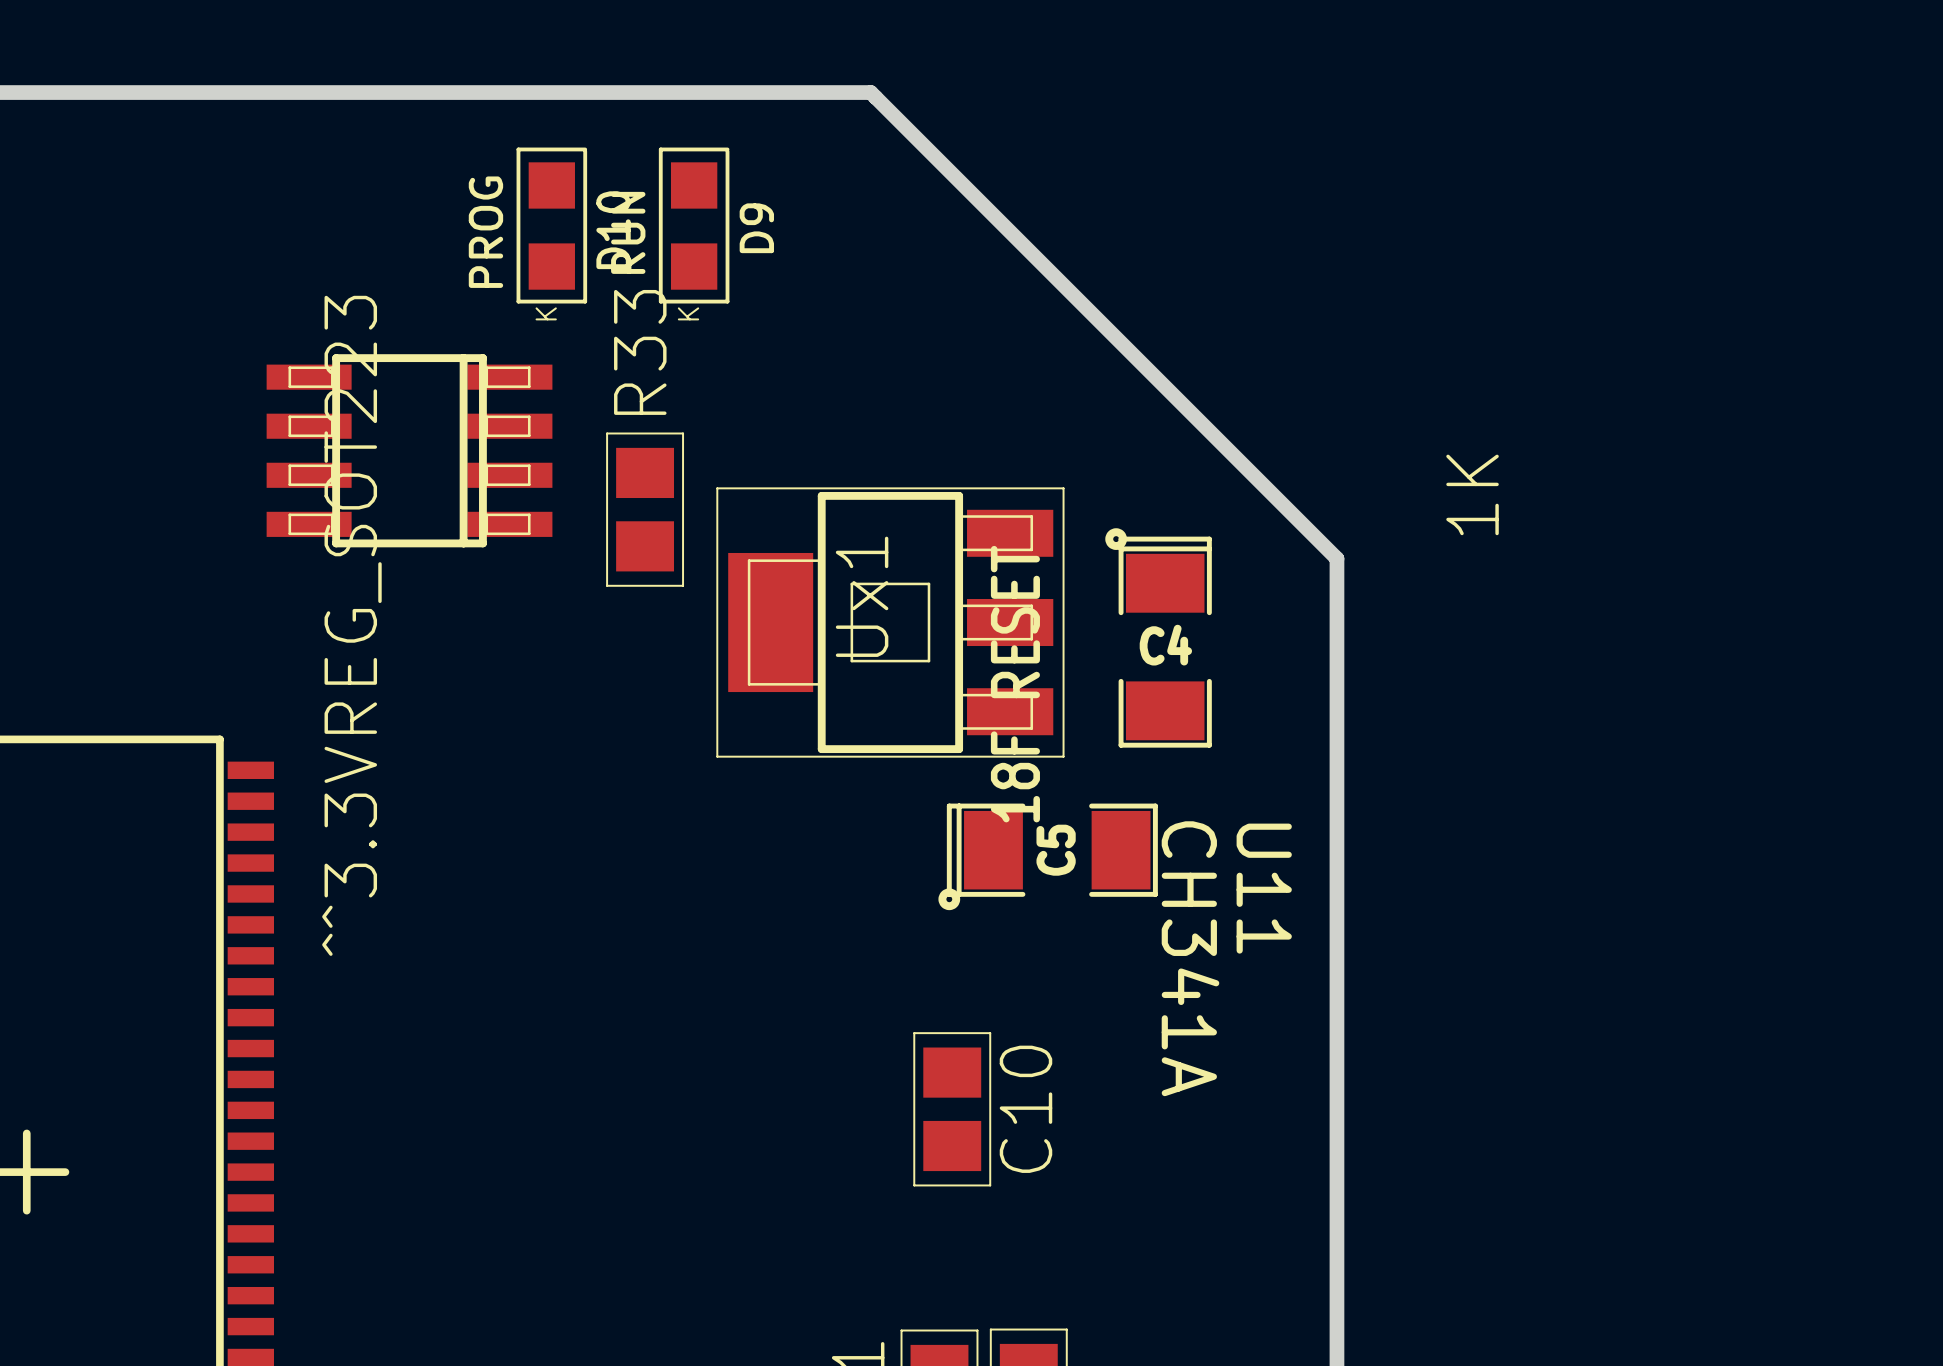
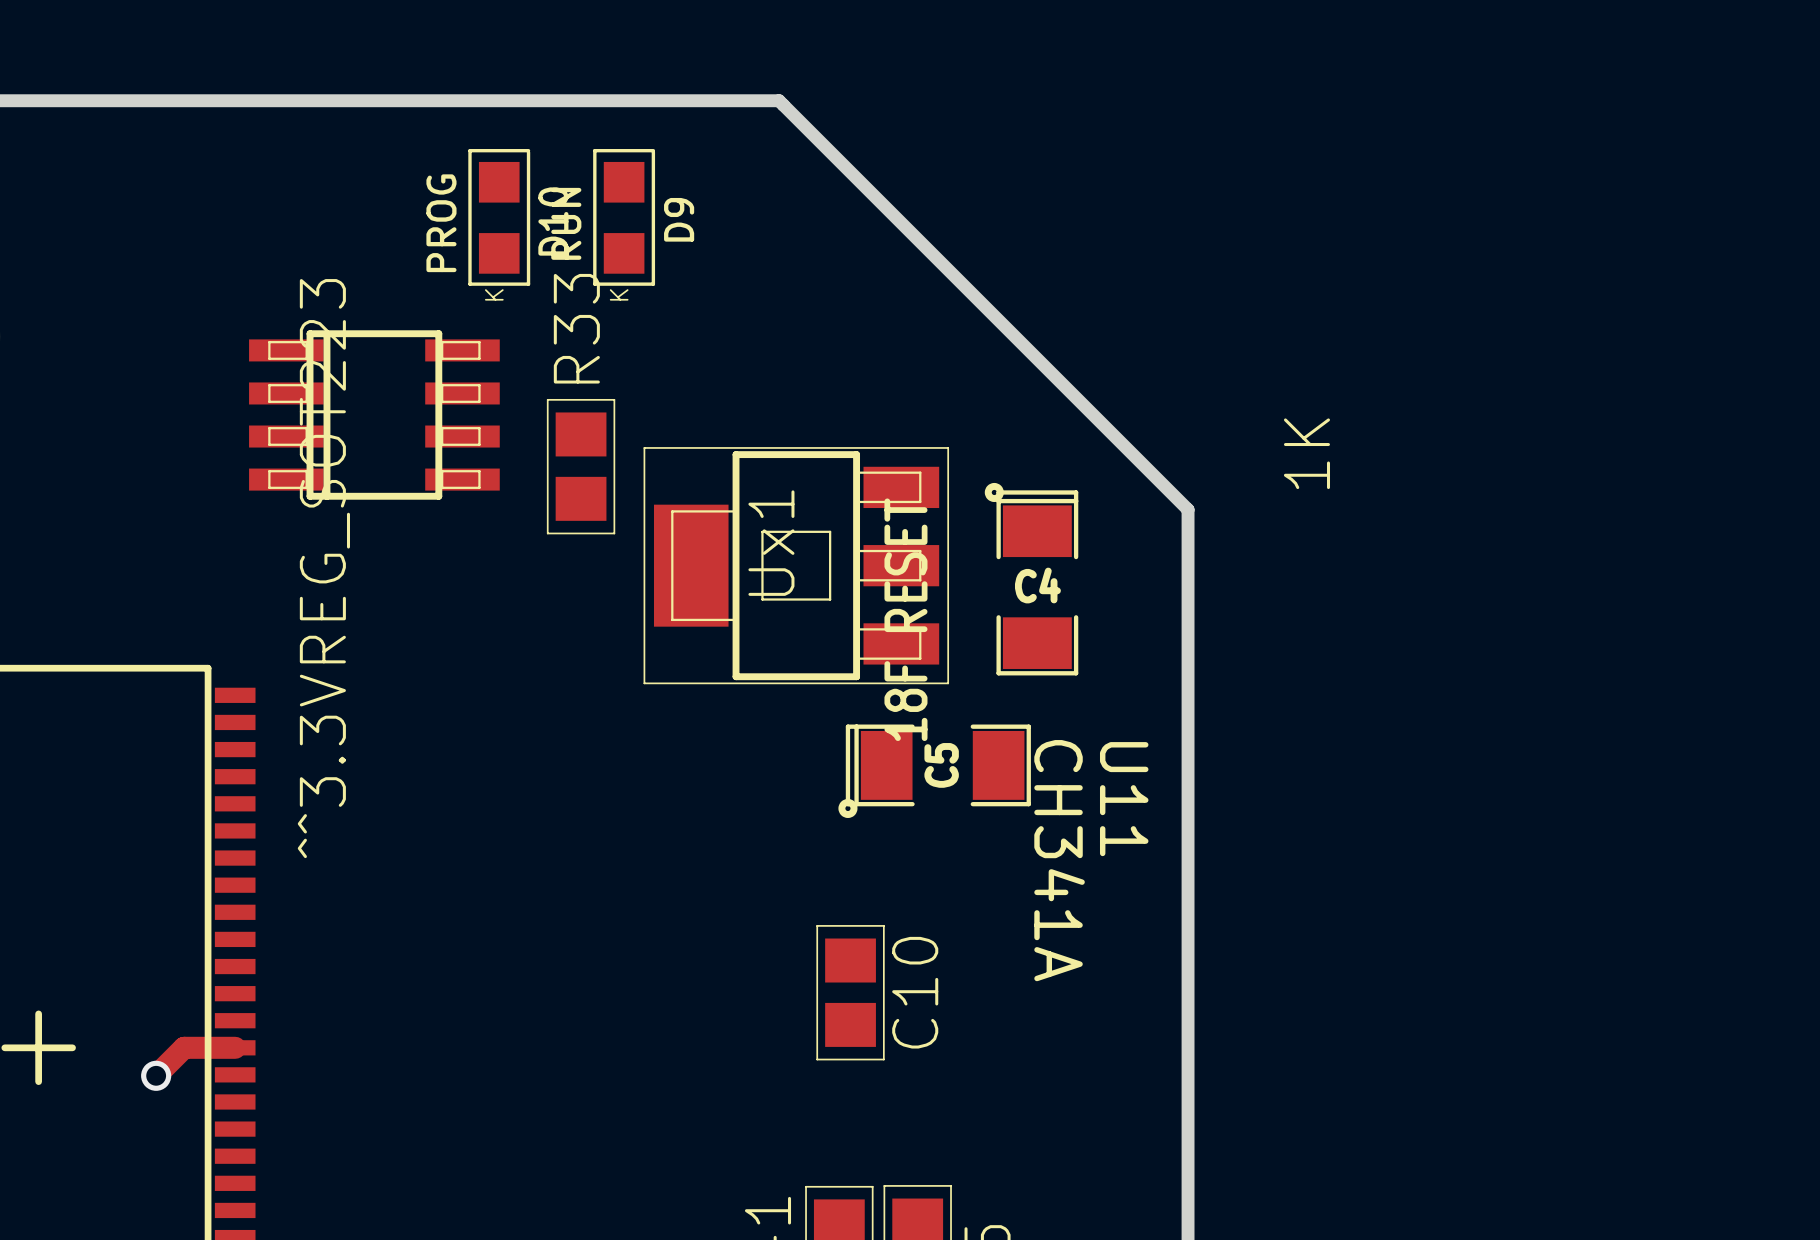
part rotation: 0° (409, 450) -> 180° (374, 414)
track: none -> (235, 1047) (184, 1047) (156, 1075)
via: none -> (156, 1075)

